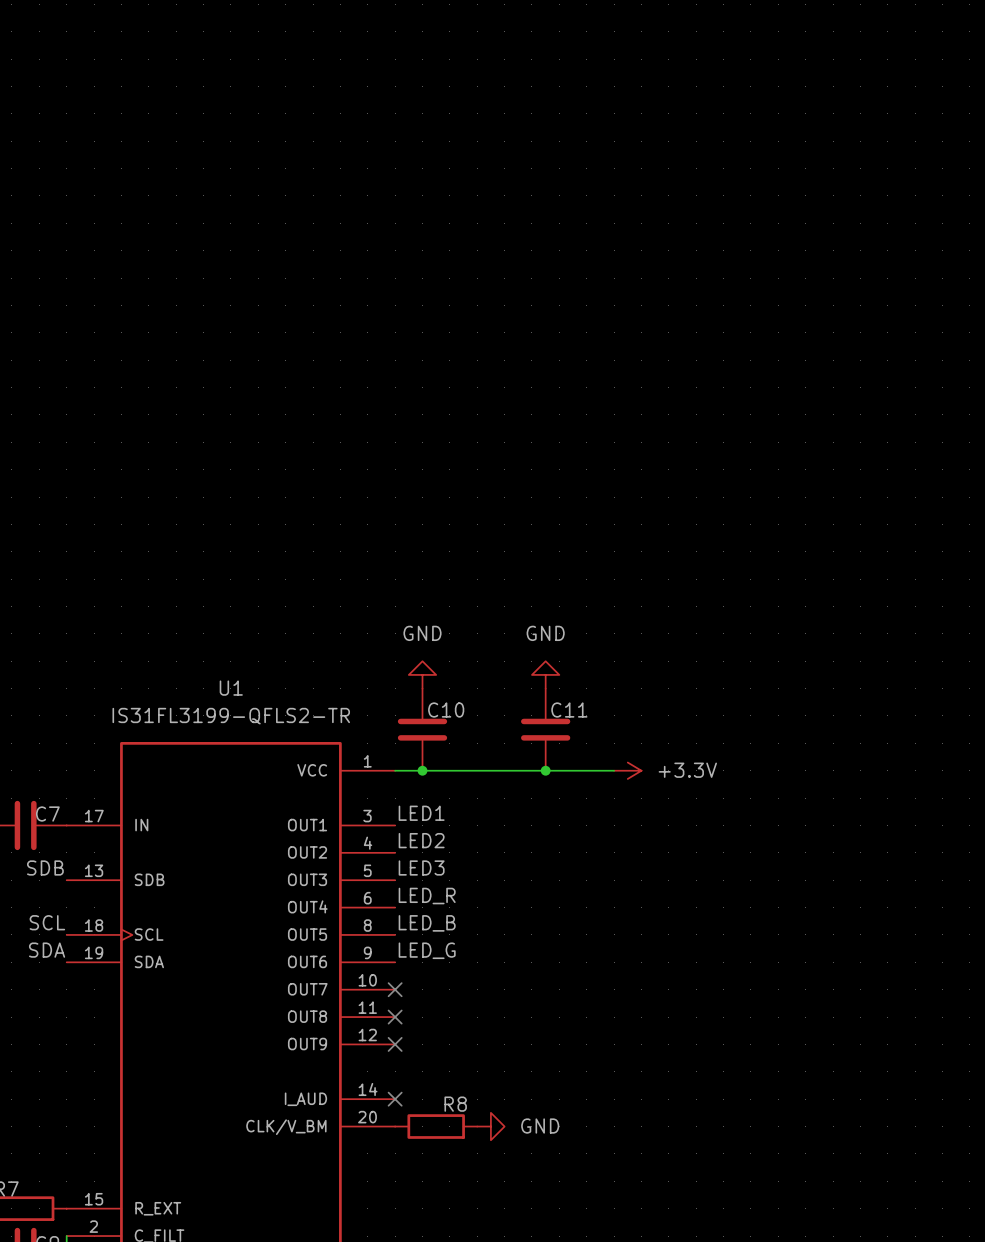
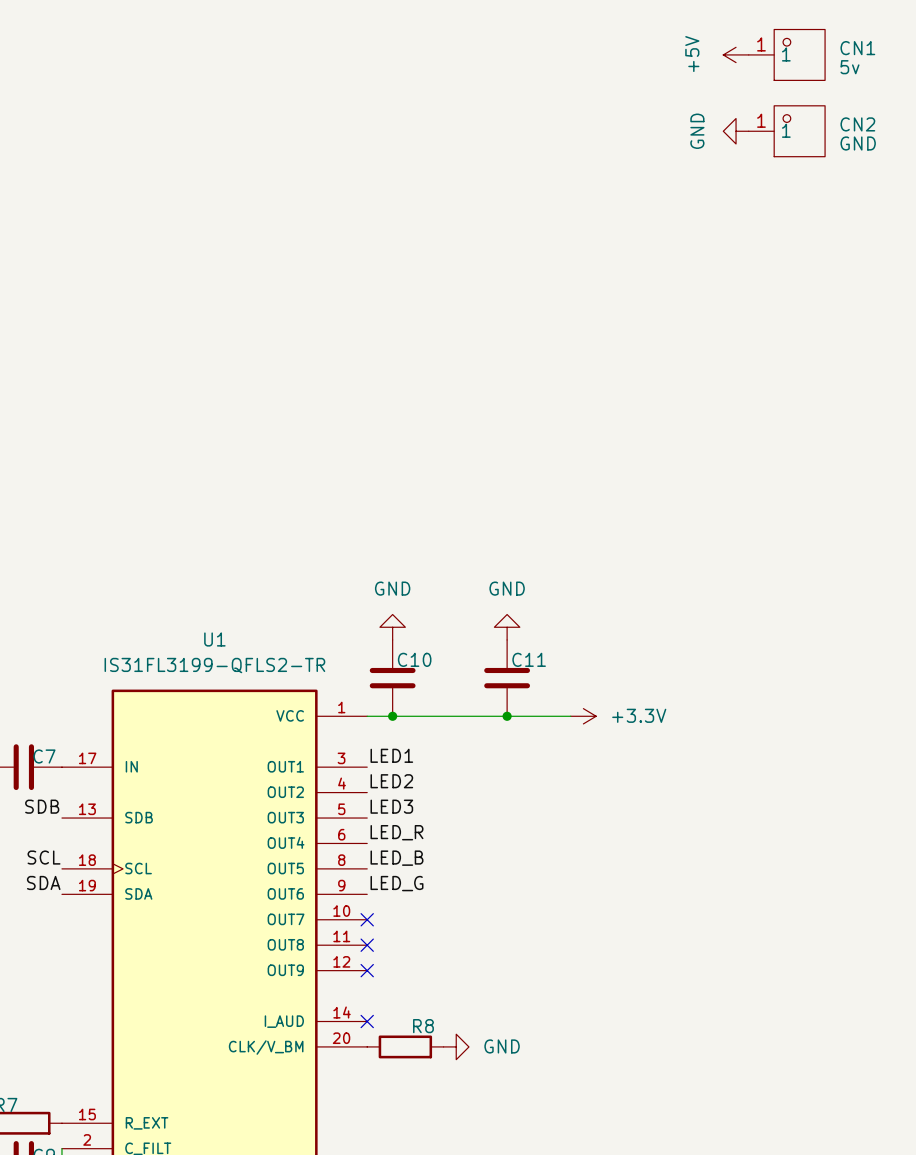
power symbol: none -> +5V (736, 54)
CN1: none -> 5v (786, 54)
power symbol: none -> GND (736, 131)
CN2: none -> GND (786, 131)

